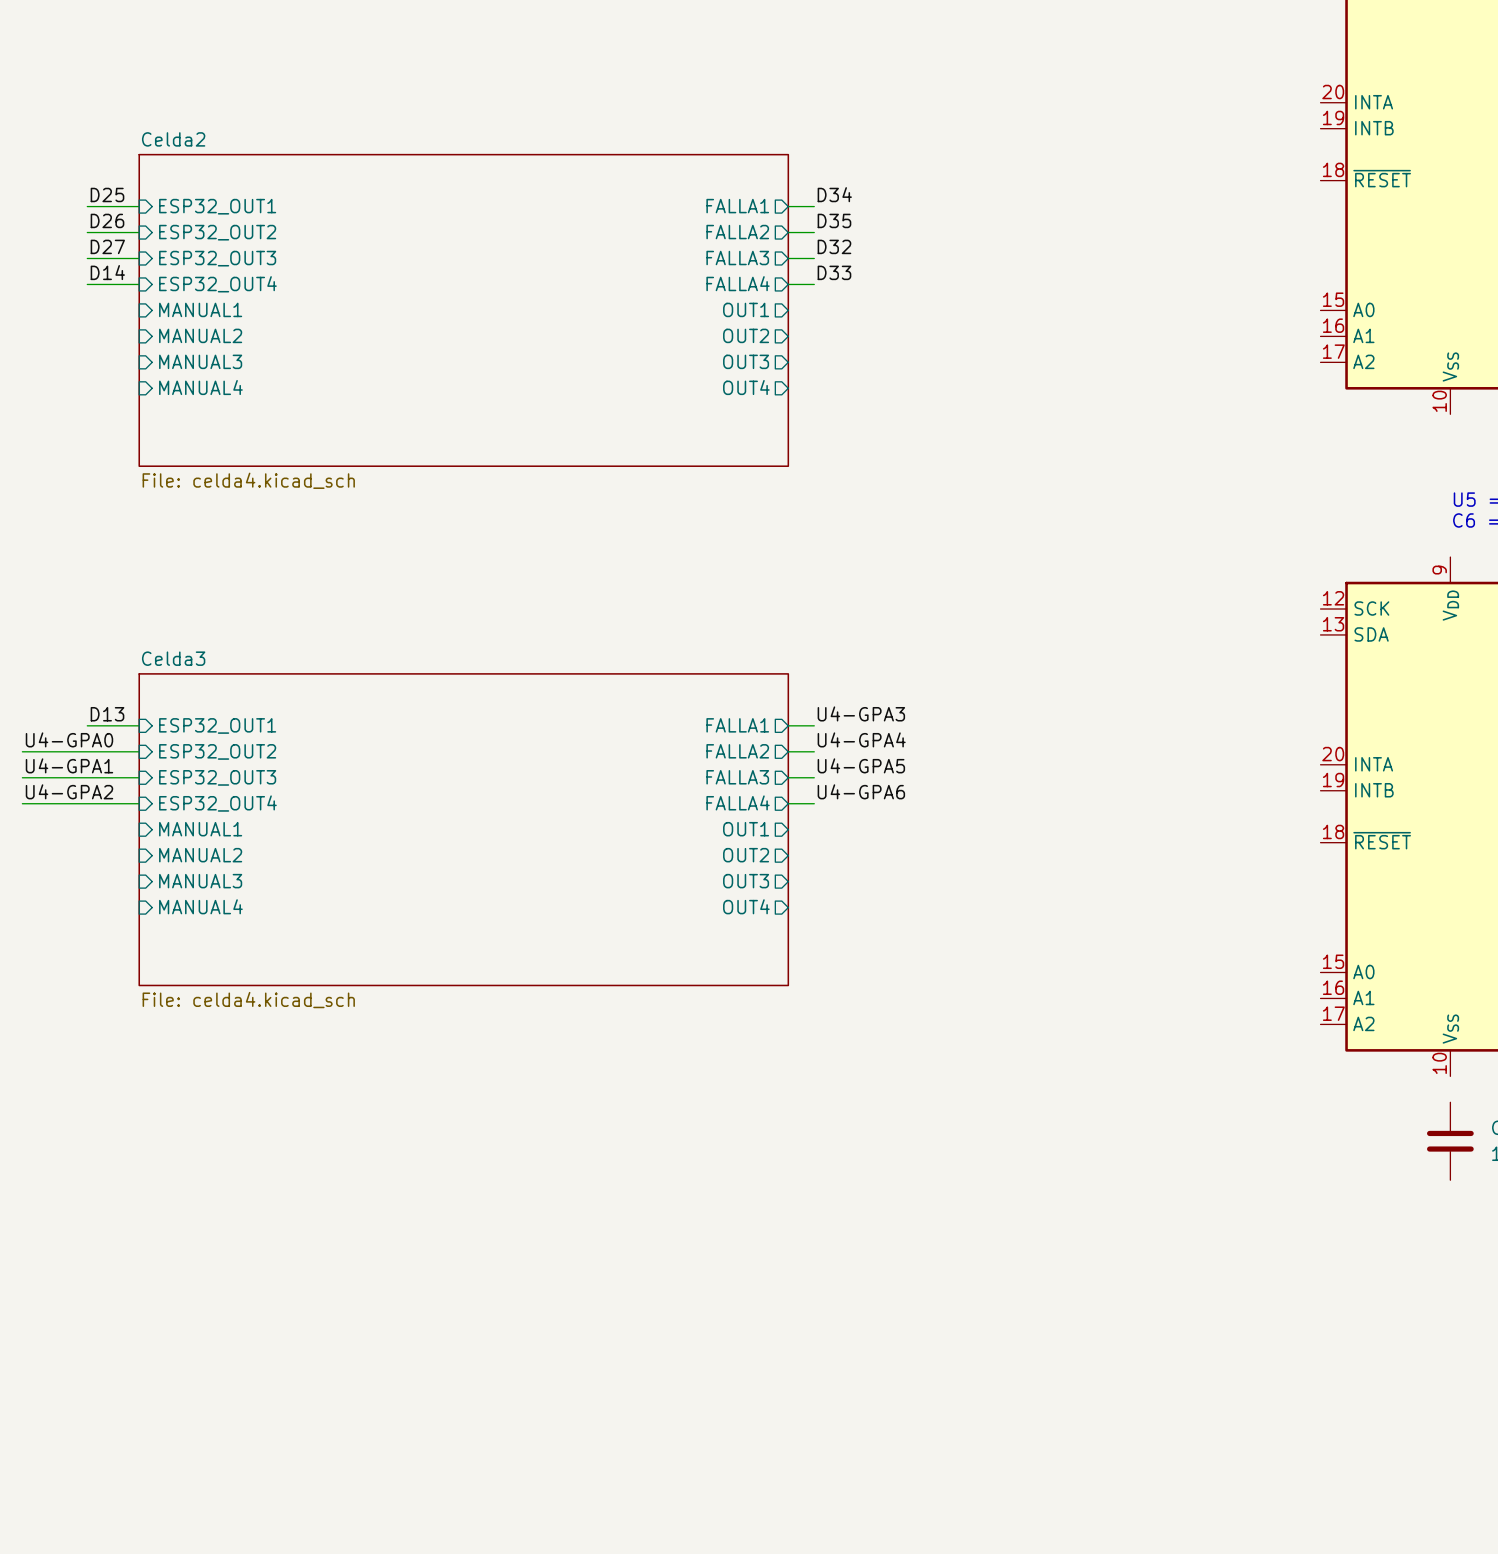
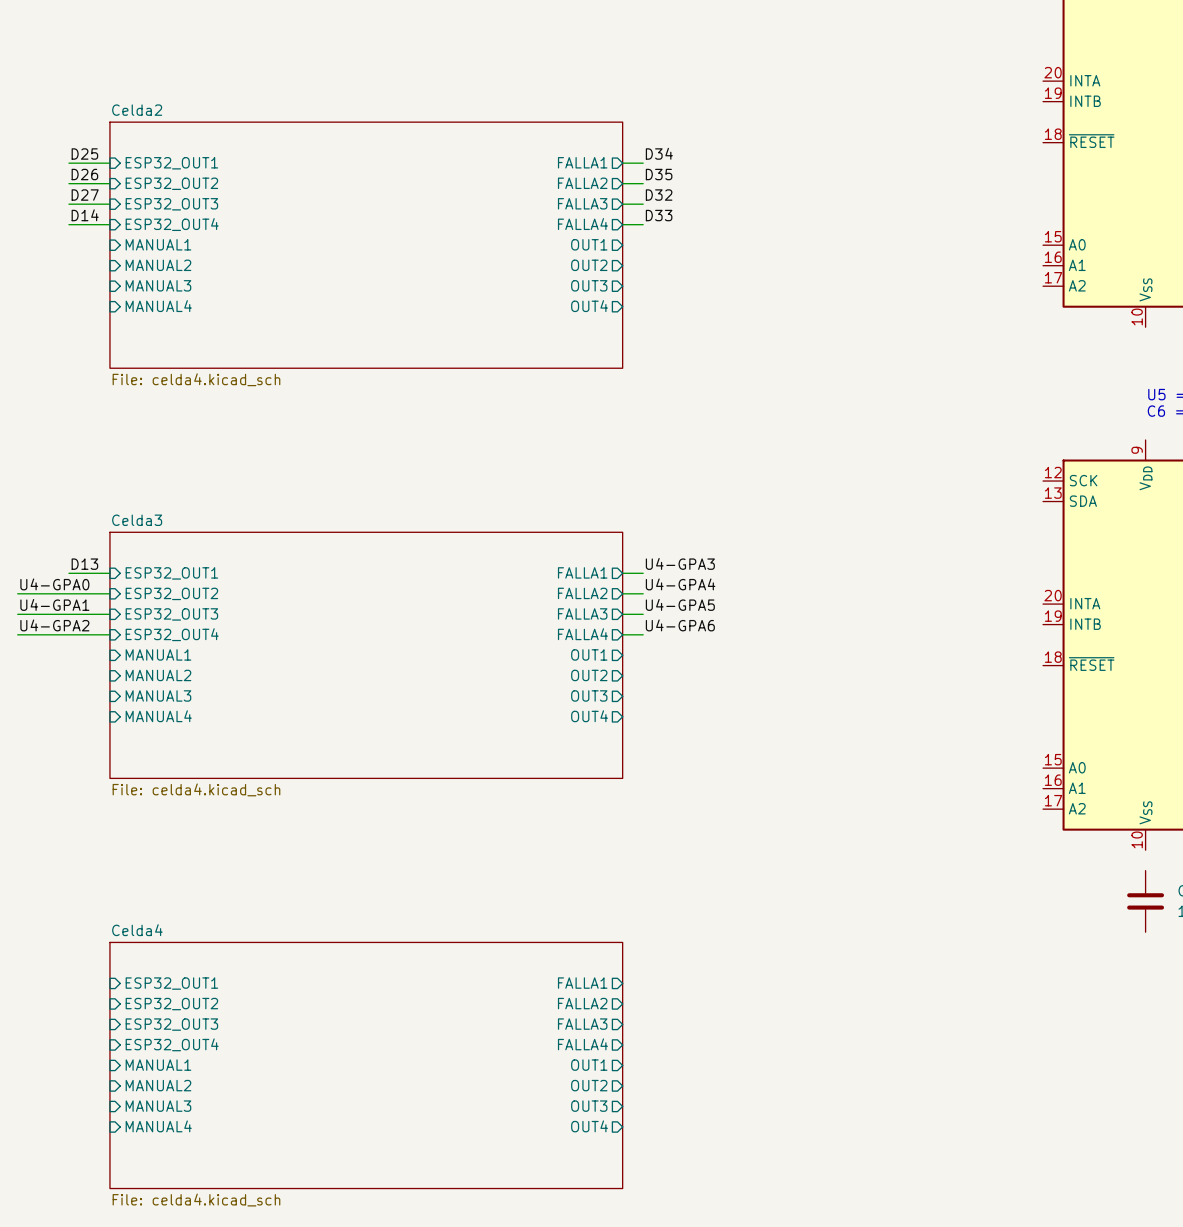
sheet pin: none -> FALLA1 (582, 983)
sheet pin: none -> ESP32_OUT1 (171, 983)
sheet pin: none -> FALLA2 (582, 1003)
sheet pin: none -> ESP32_OUT2 (171, 1004)
sheet pin: none -> FALLA3 (582, 1024)
sheet pin: none -> ESP32_OUT3 (171, 1024)
sheet pin: none -> ESP32_OUT4 (172, 1044)
sheet pin: none -> FALLA4 (582, 1044)
sheet pin: none -> MANUAL1 (158, 1065)
sheet Celda4: none -> File: celda4.kicad_sch (366, 1065)
sheet pin: none -> OUT1 (589, 1065)
sheet pin: none -> MANUAL2 (158, 1085)
sheet pin: none -> OUT2 (589, 1085)
sheet pin: none -> MANUAL3 (158, 1106)
sheet pin: none -> OUT3 (589, 1106)
sheet pin: none -> MANUAL4 (158, 1126)
sheet pin: none -> OUT4 (589, 1126)

